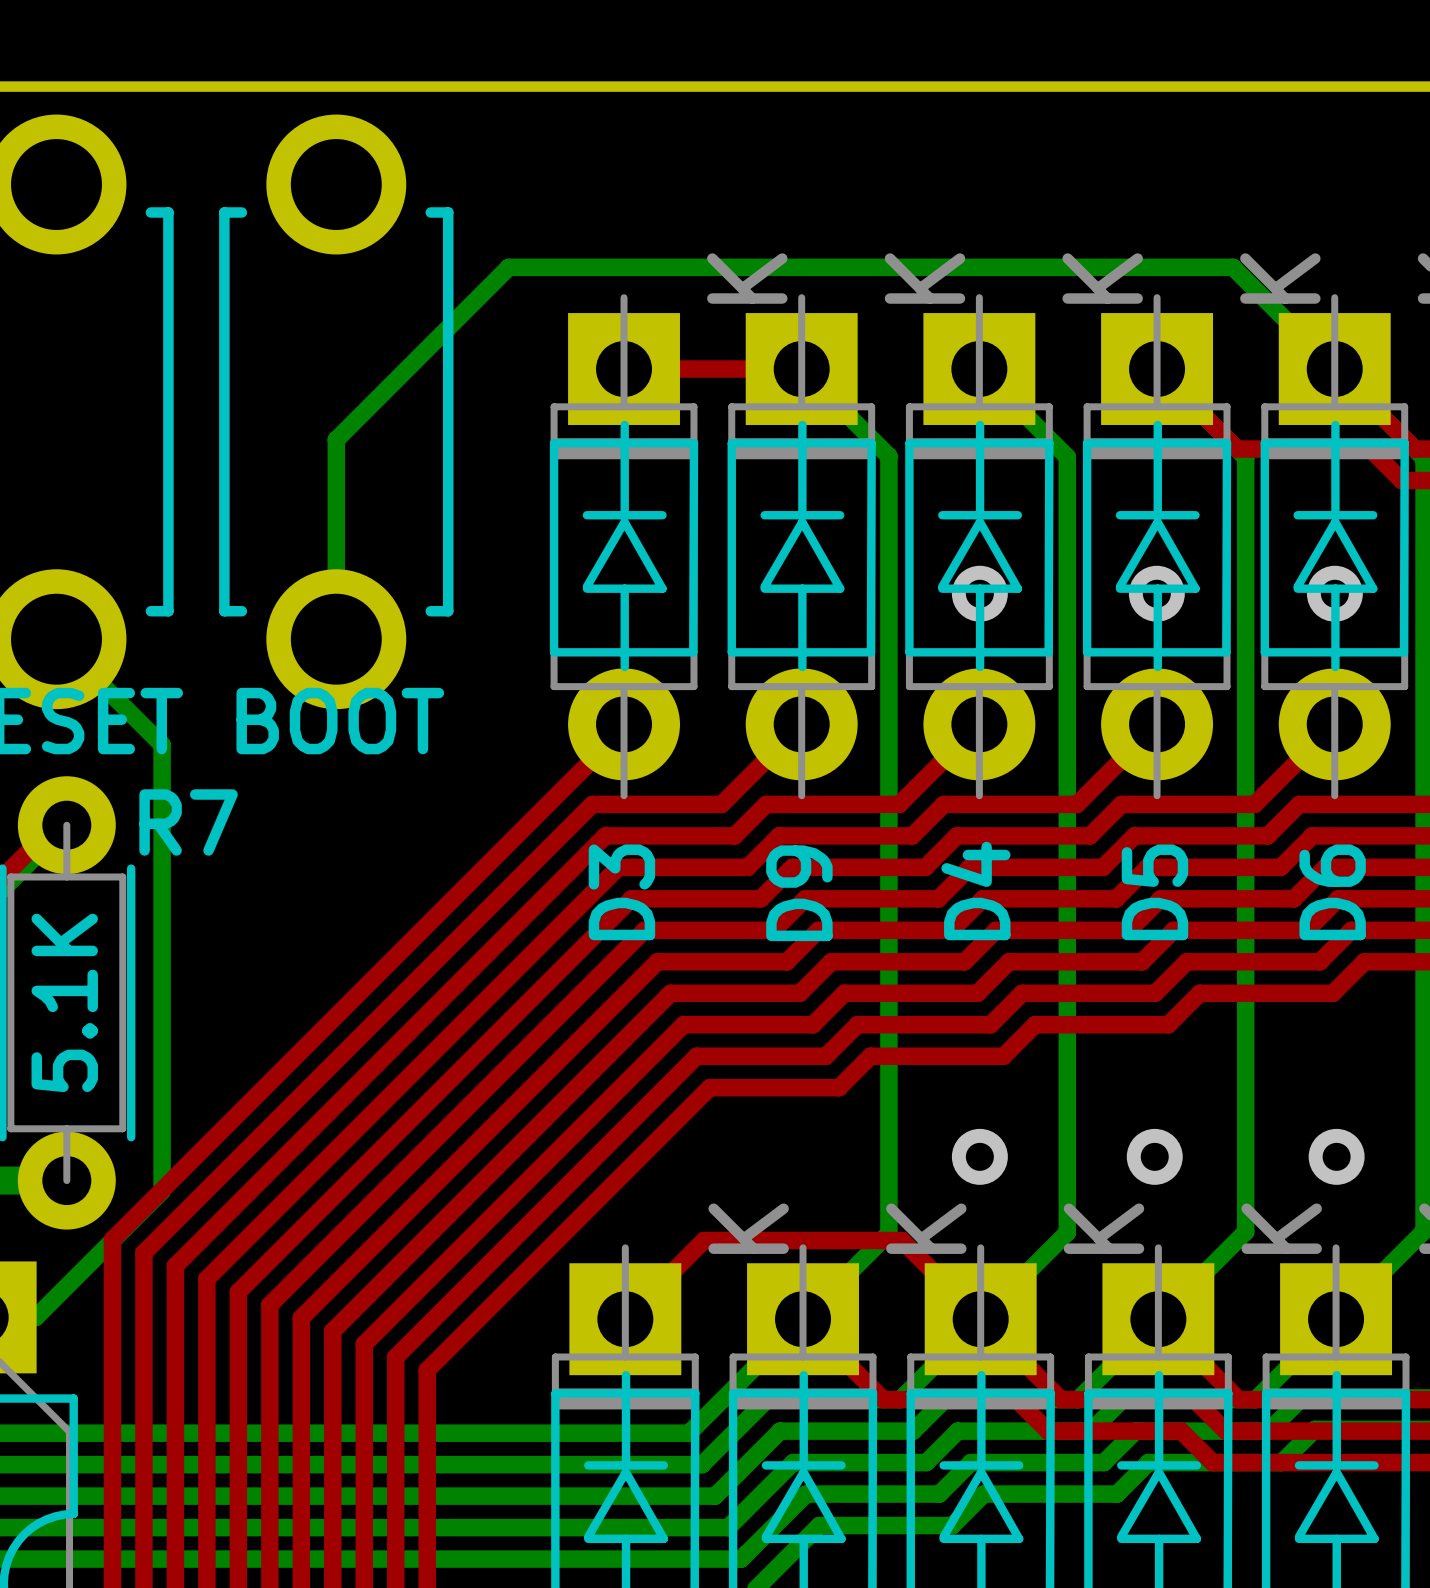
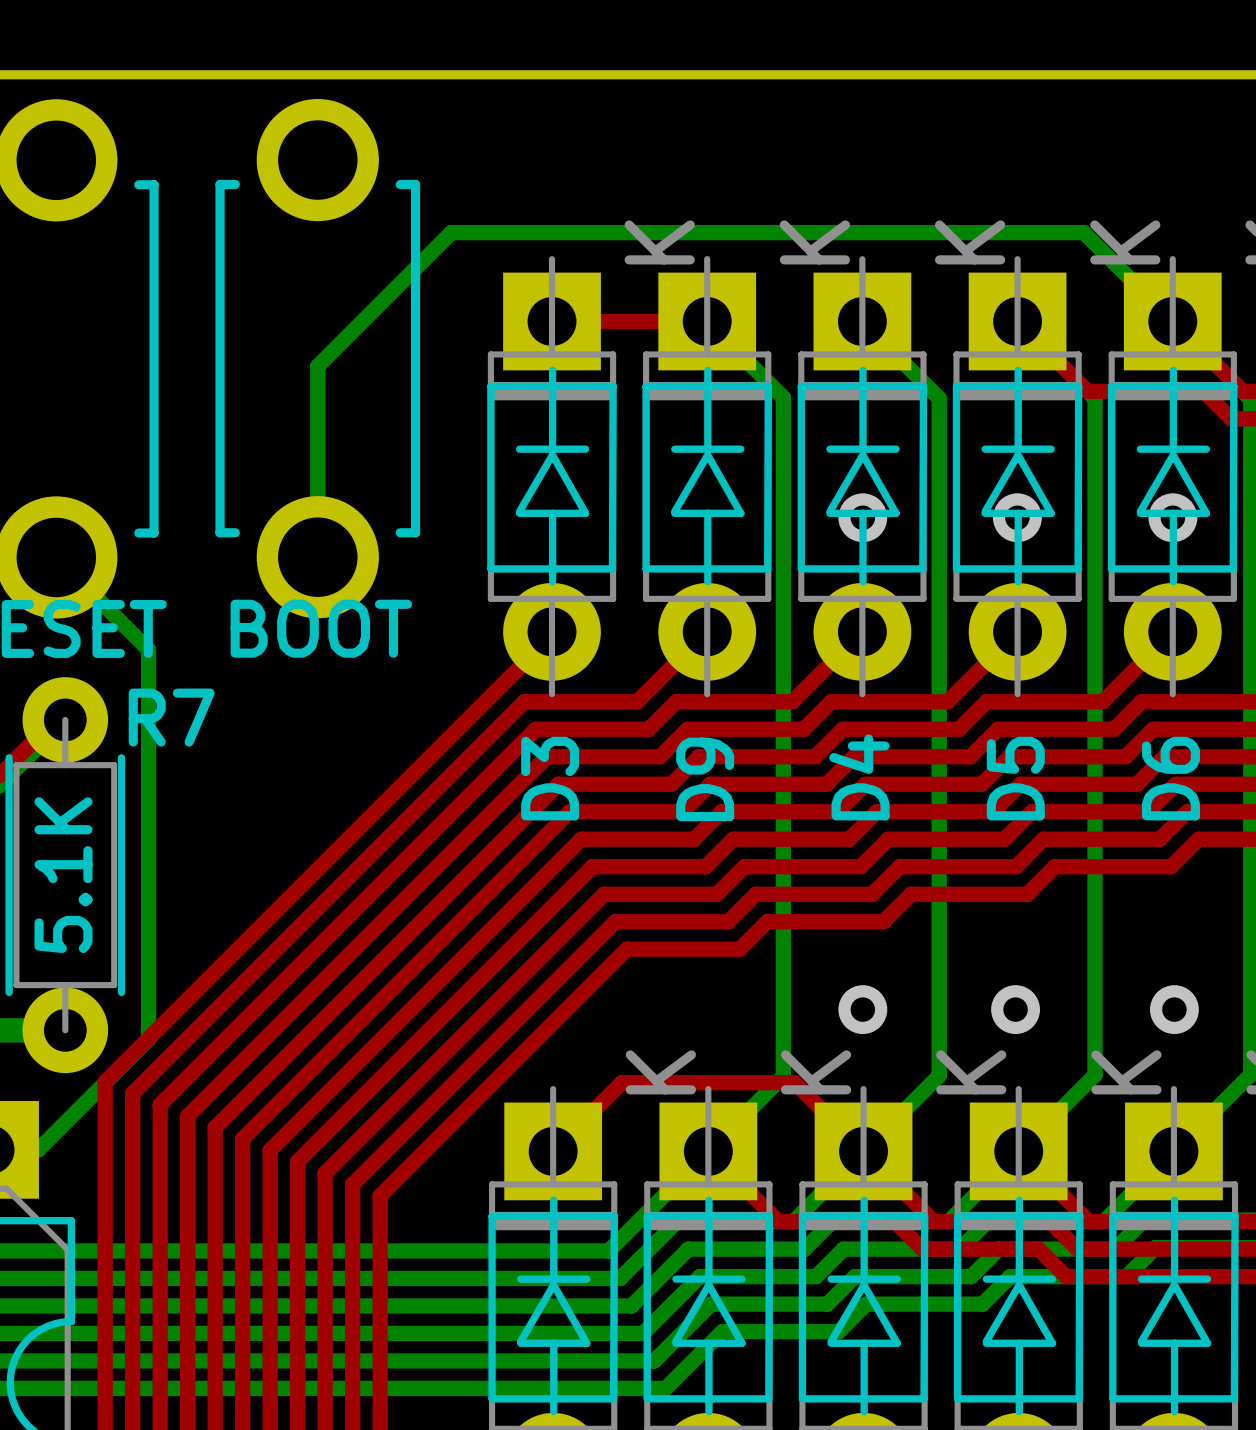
part position: (336, 411) -> (317, 358)
bottom track: (355, 420) (336, 439) (336, 639) -> (317, 366) (317, 557)

